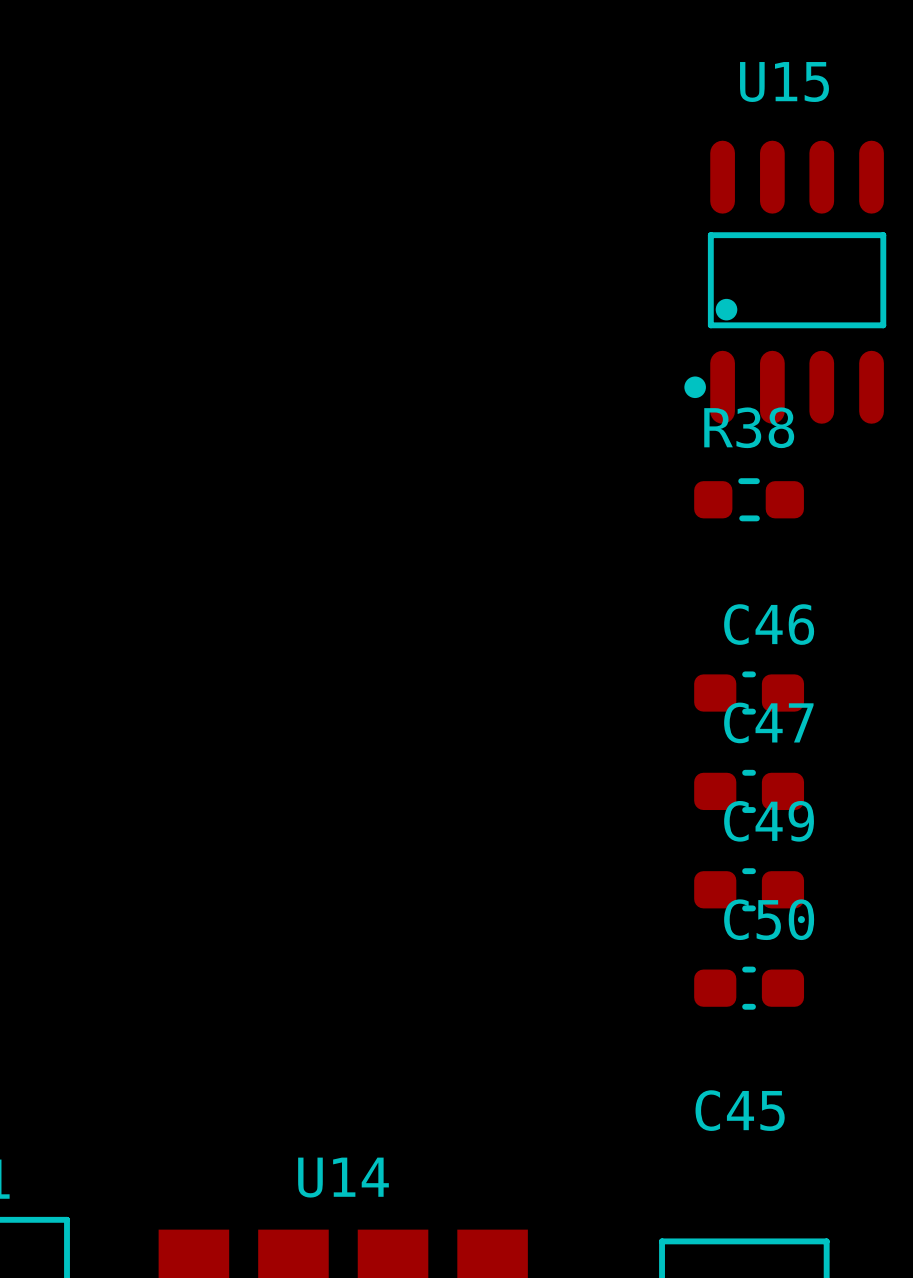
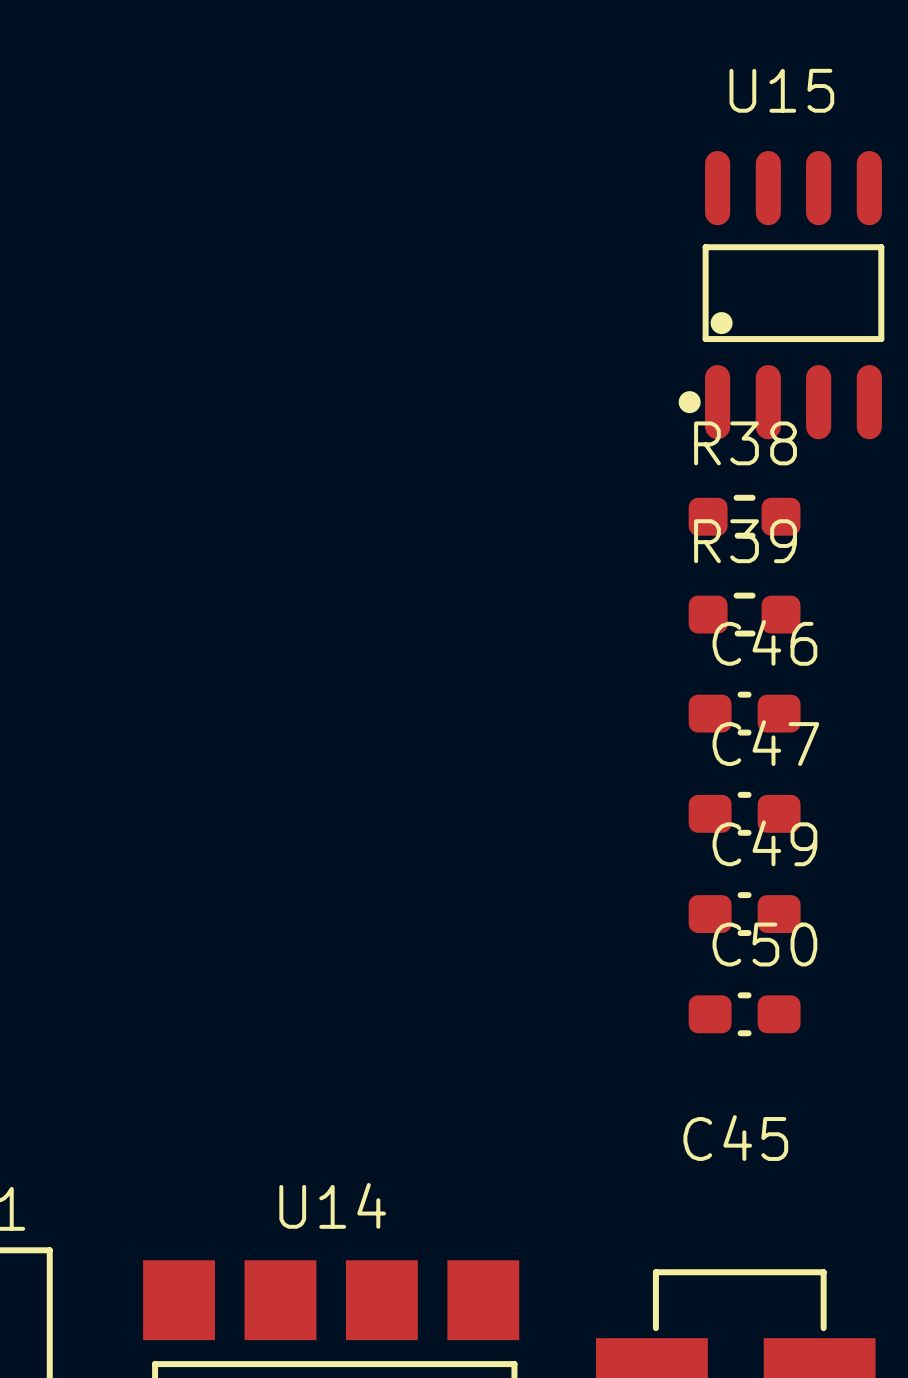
R39: none -> (744, 614)

